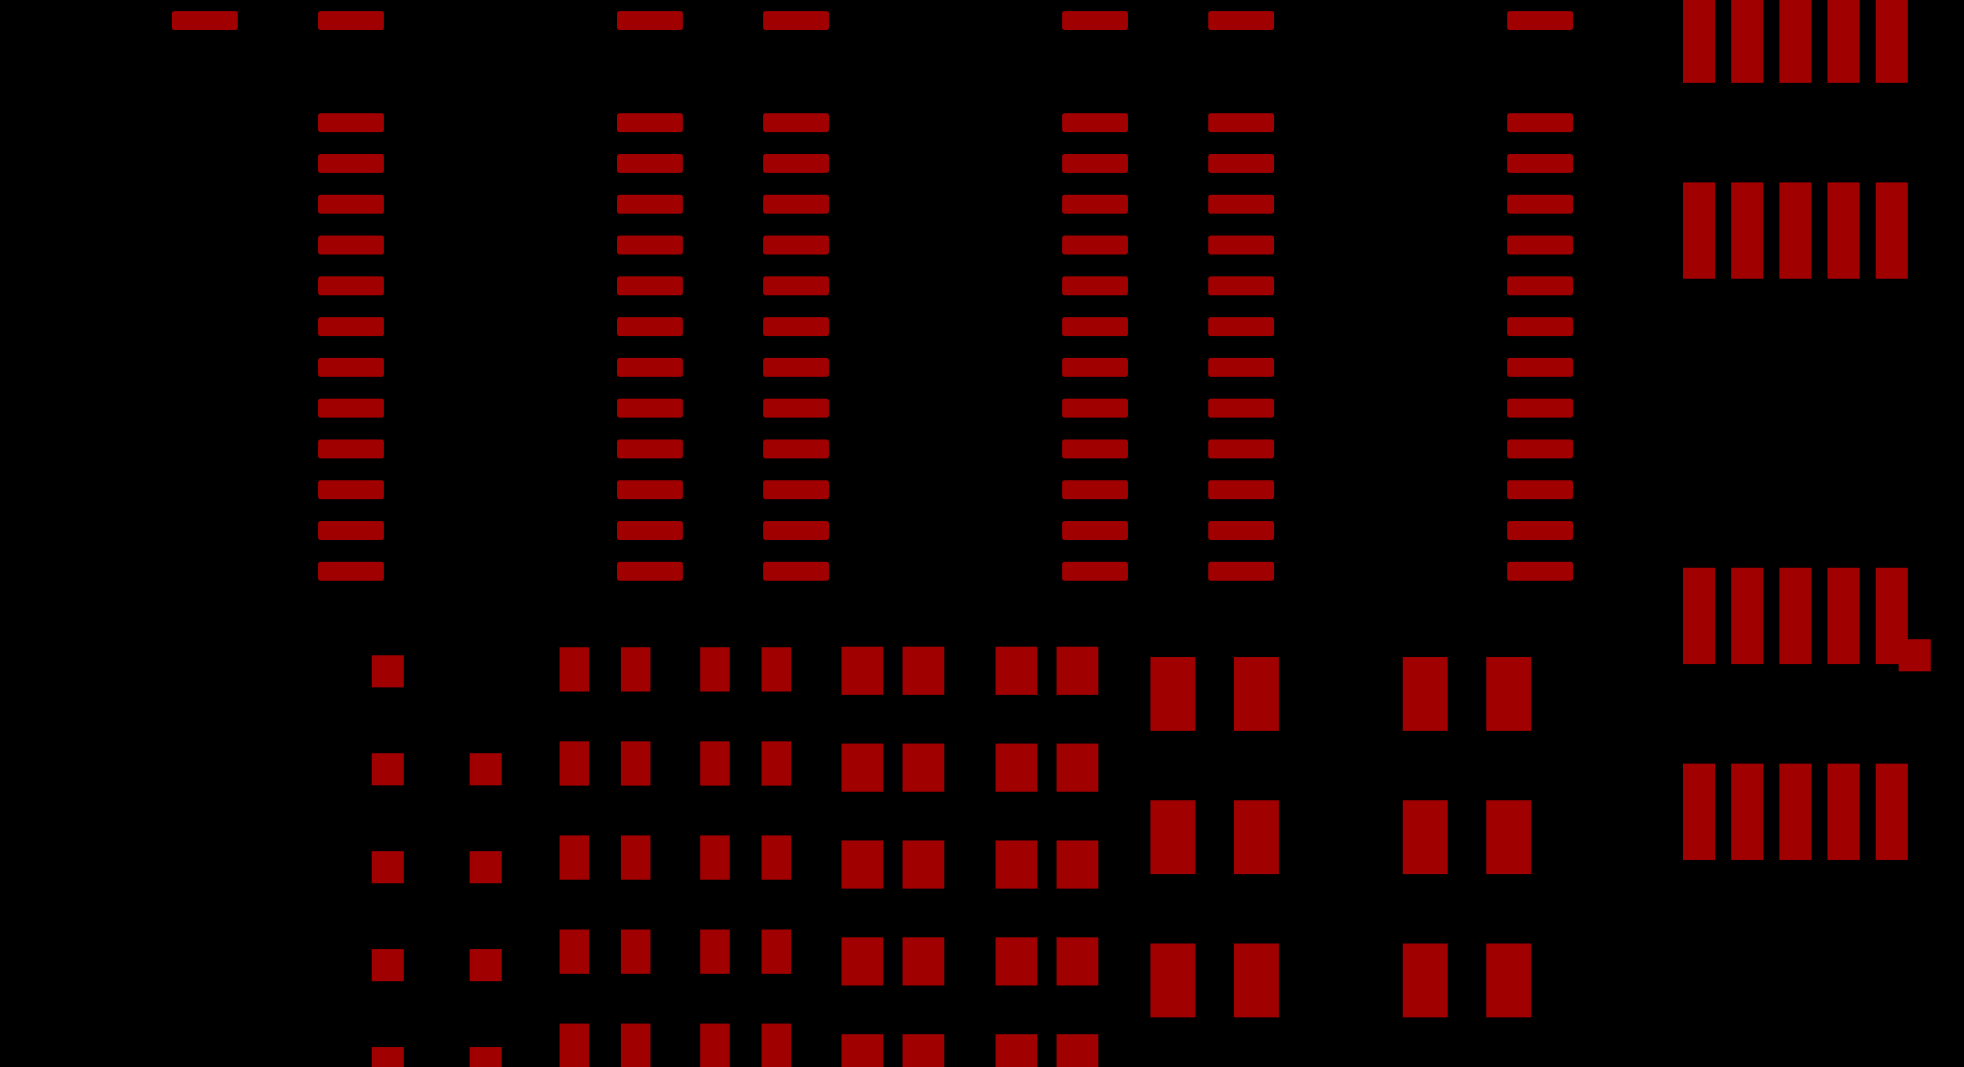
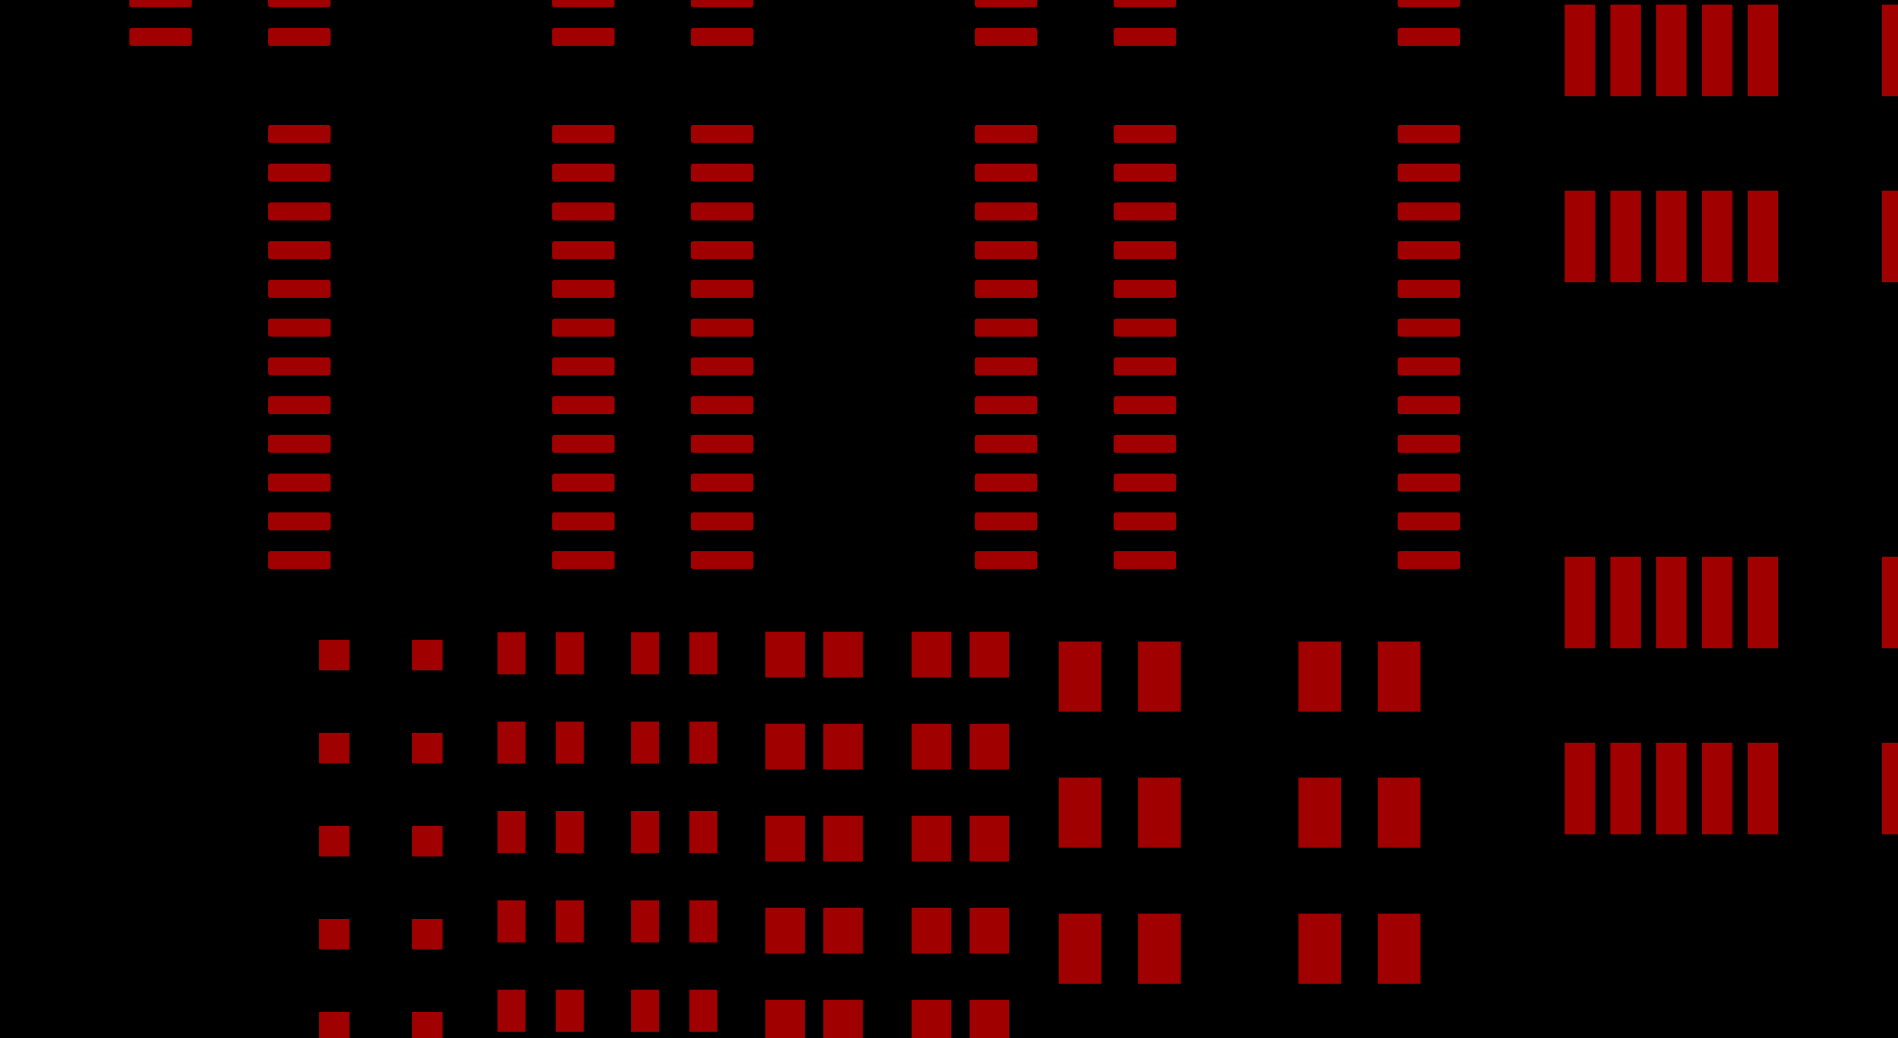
part: (1914, 655) -> none
part: none -> (427, 655)

